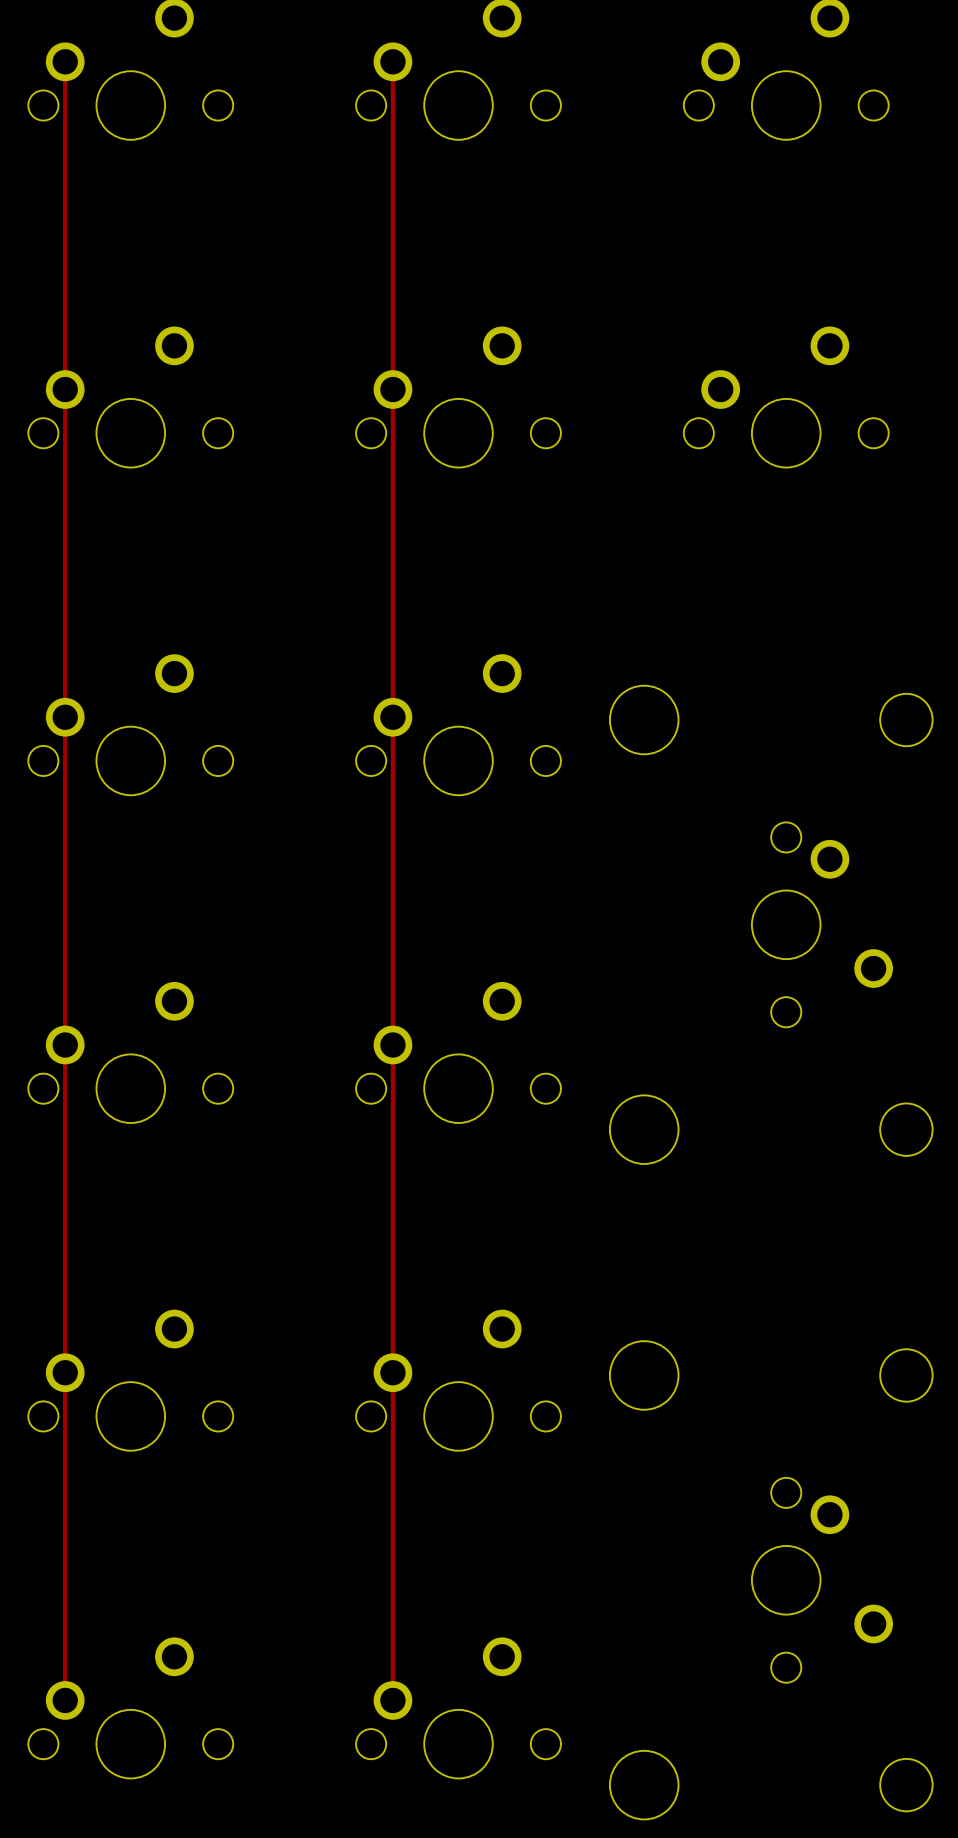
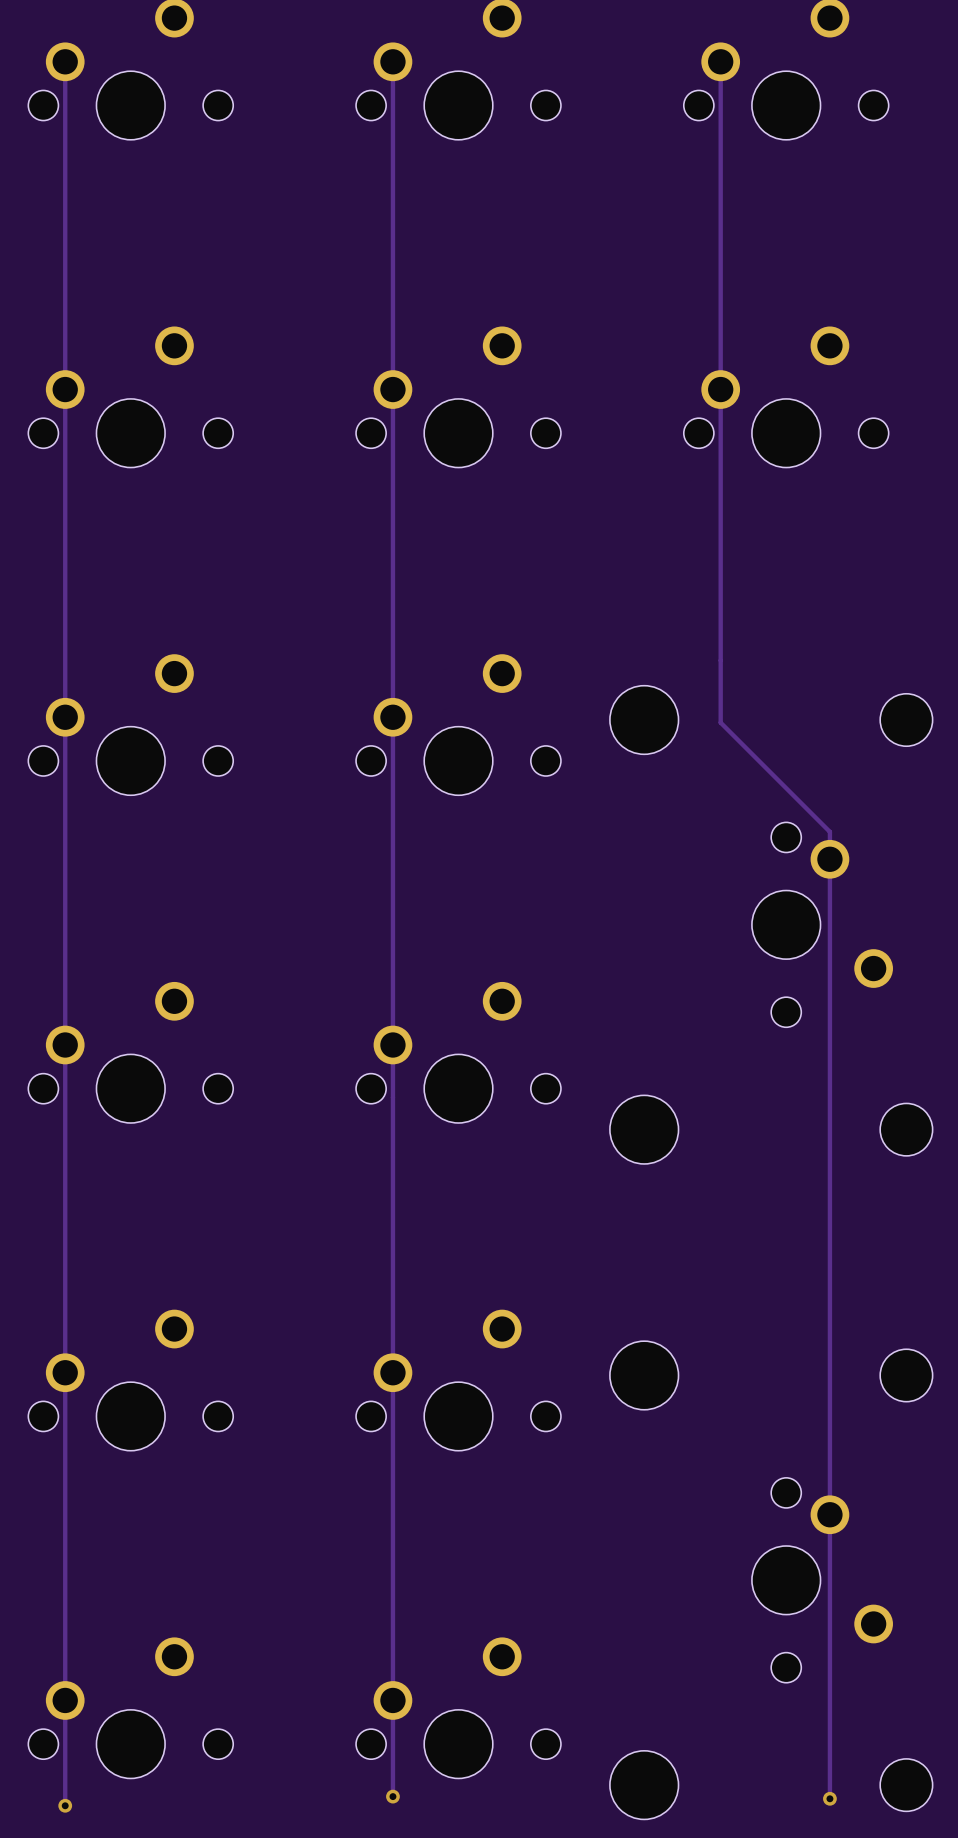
track: none -> (720, 61) (720, 722) (829, 831) (829, 1798)
track: none -> (65, 1700) (65, 1805)
track: none -> (392, 1700) (392, 1796)
via: none -> (392, 1796)
via: none -> (829, 1798)
via: none -> (65, 1805)

